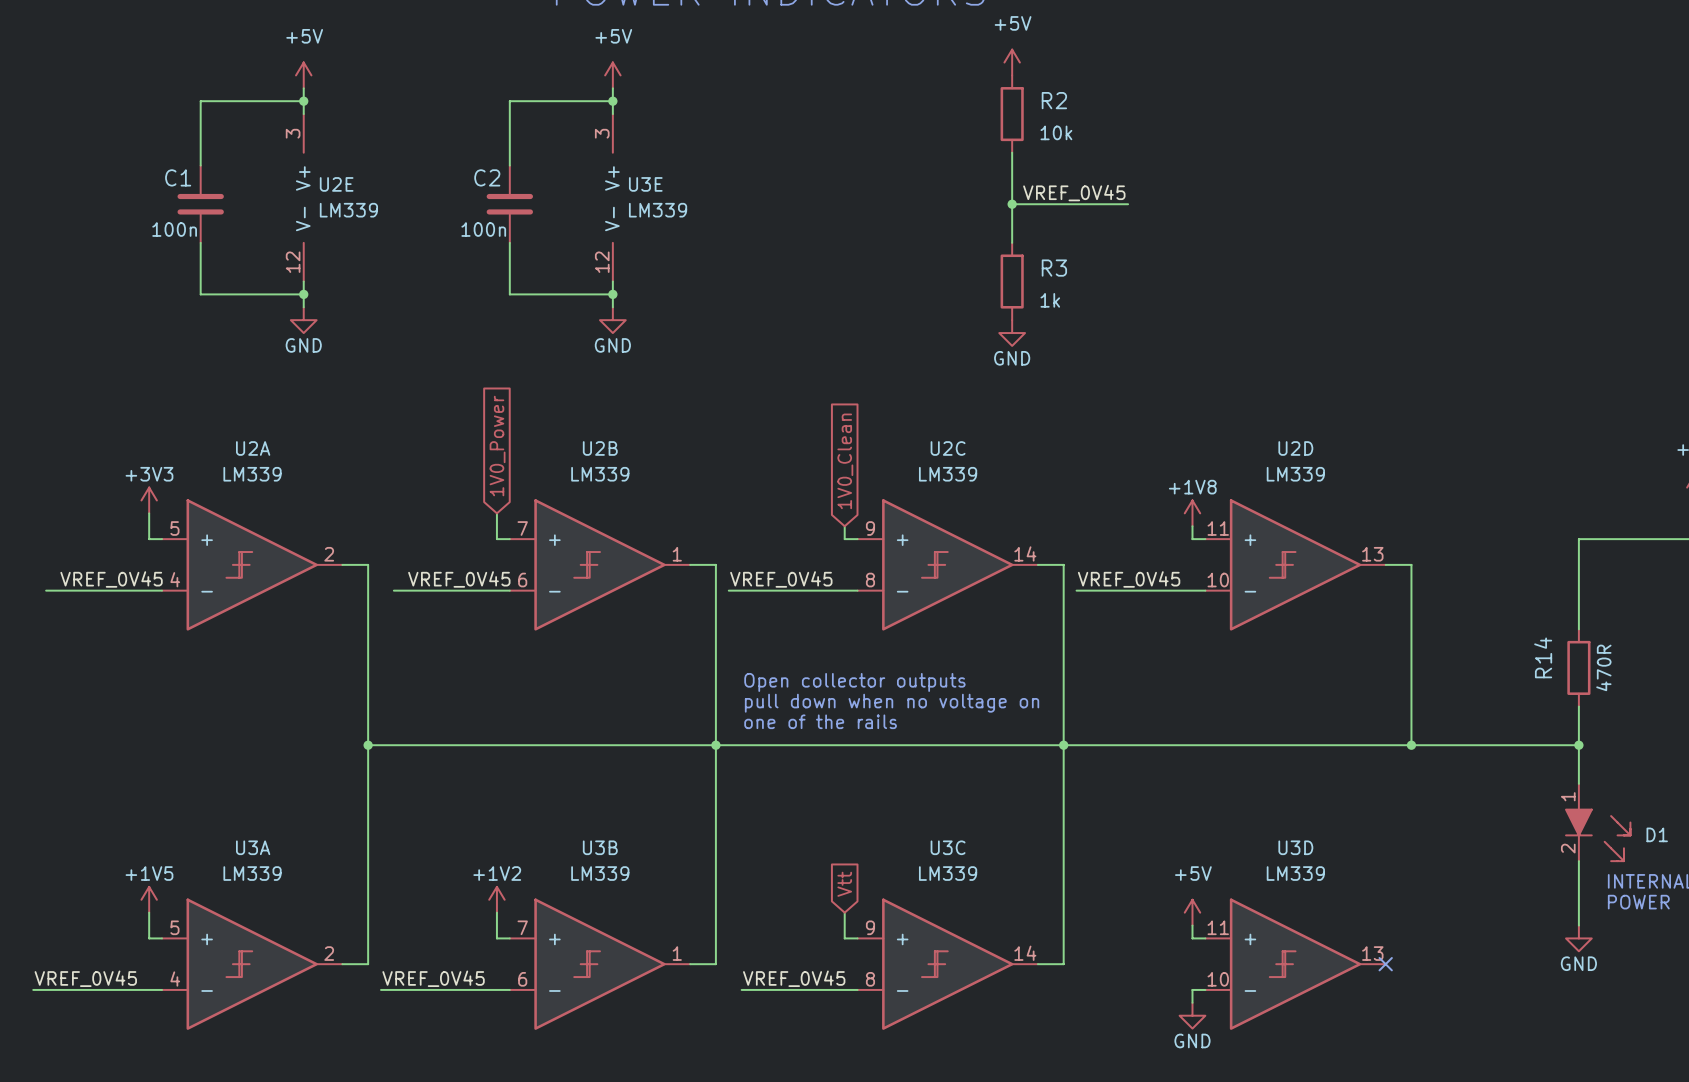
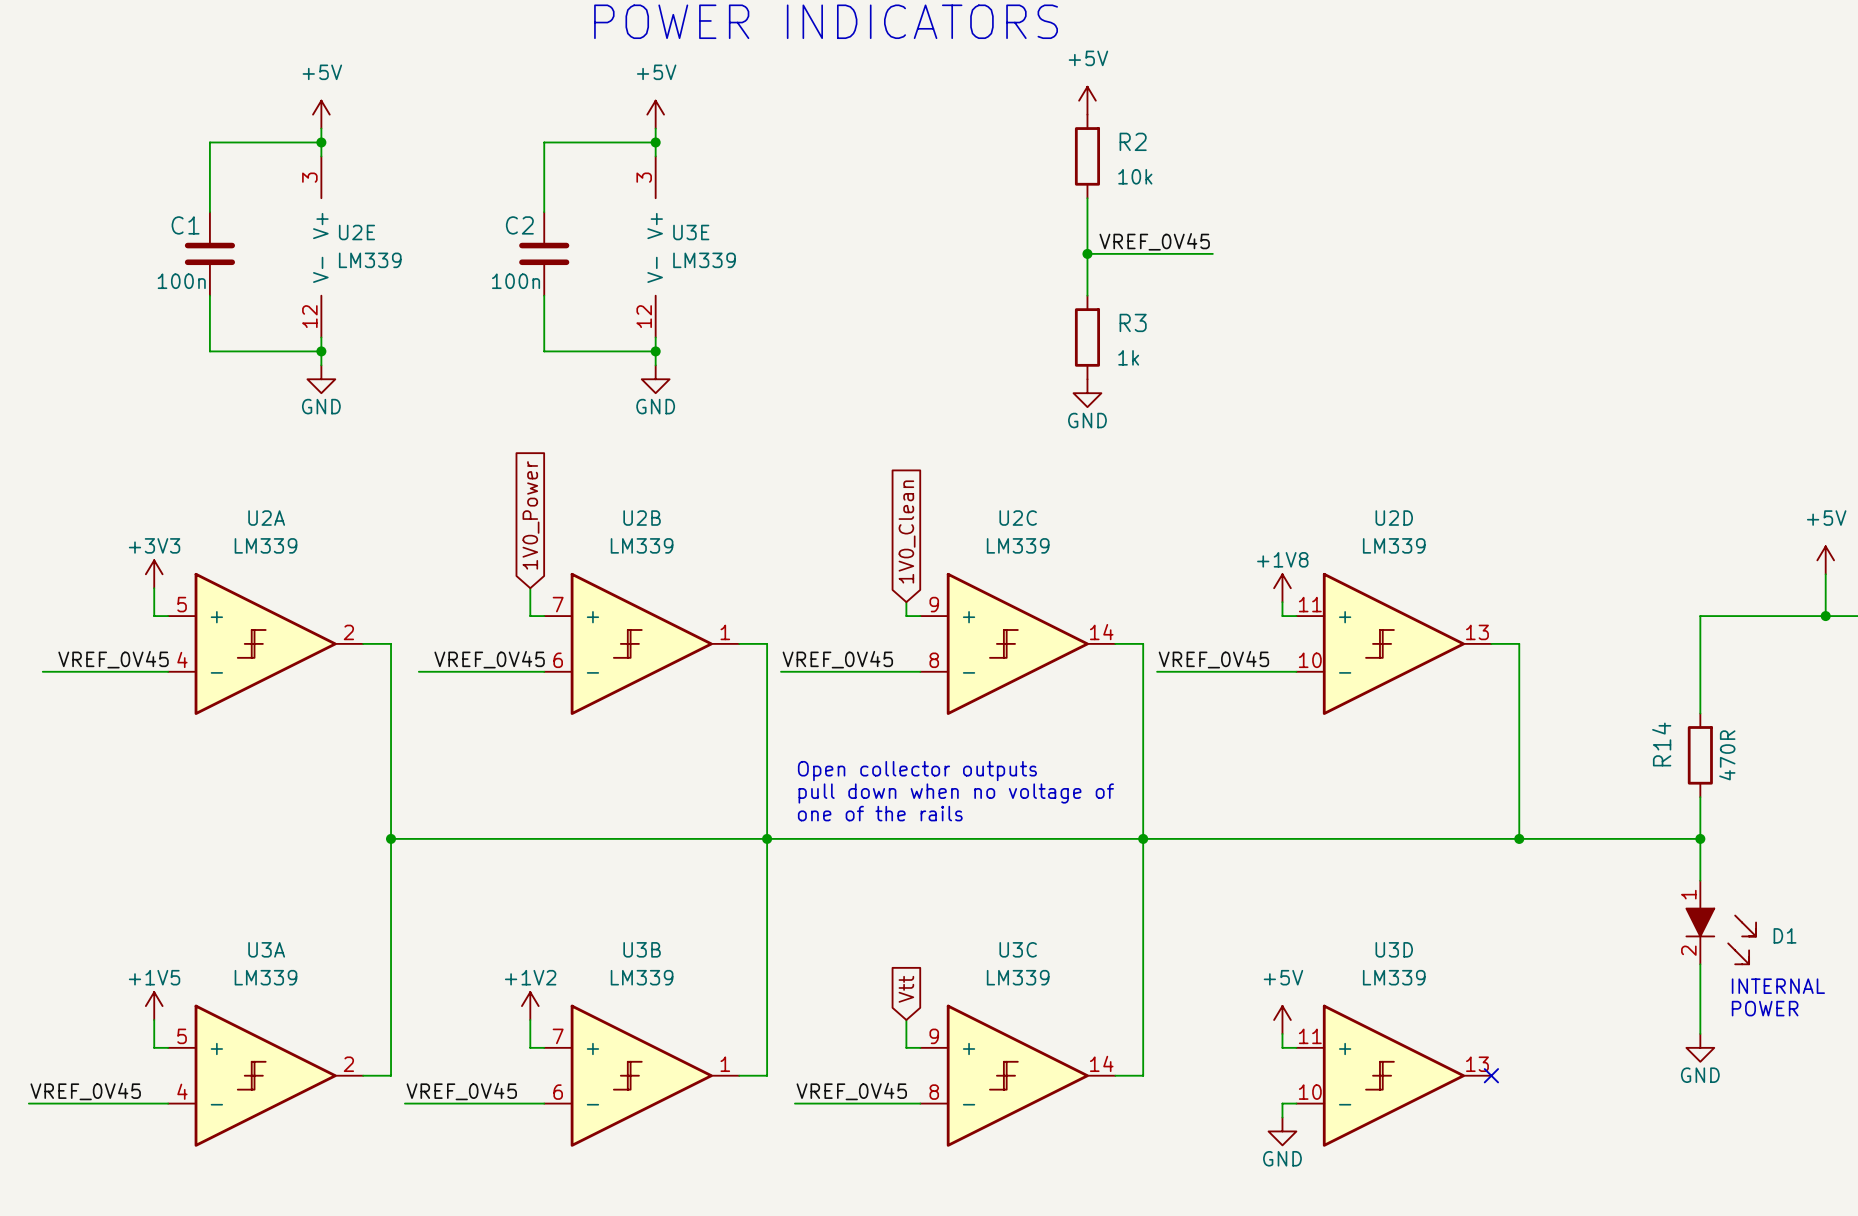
text: pull down when no voltage on (892, 703) -> pull down when no voltage of (956, 793)

